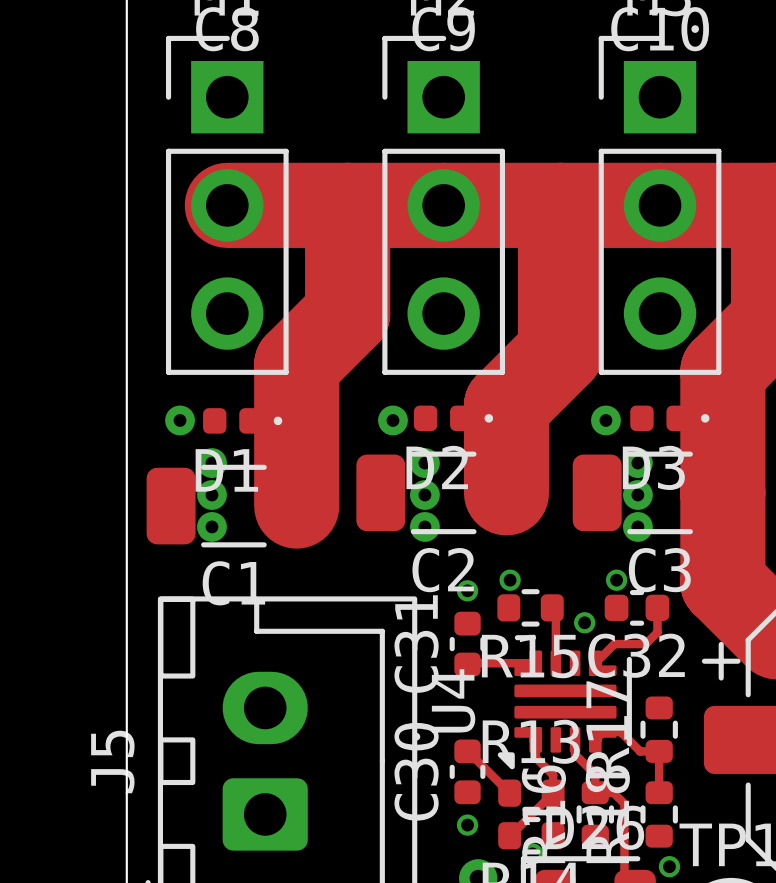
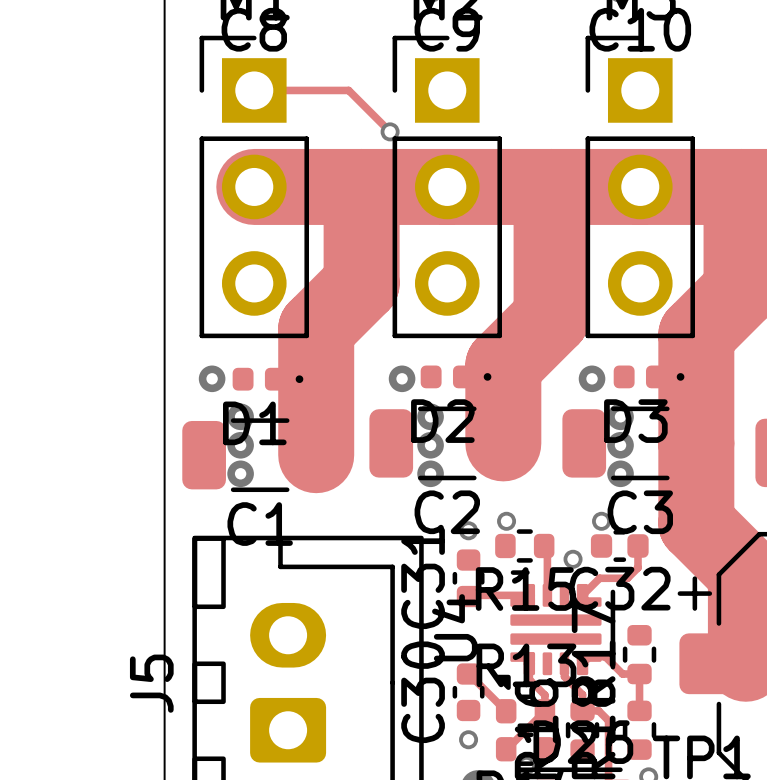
track: none -> (254, 90) (348, 90) (390, 131)
via: none -> (390, 131)

